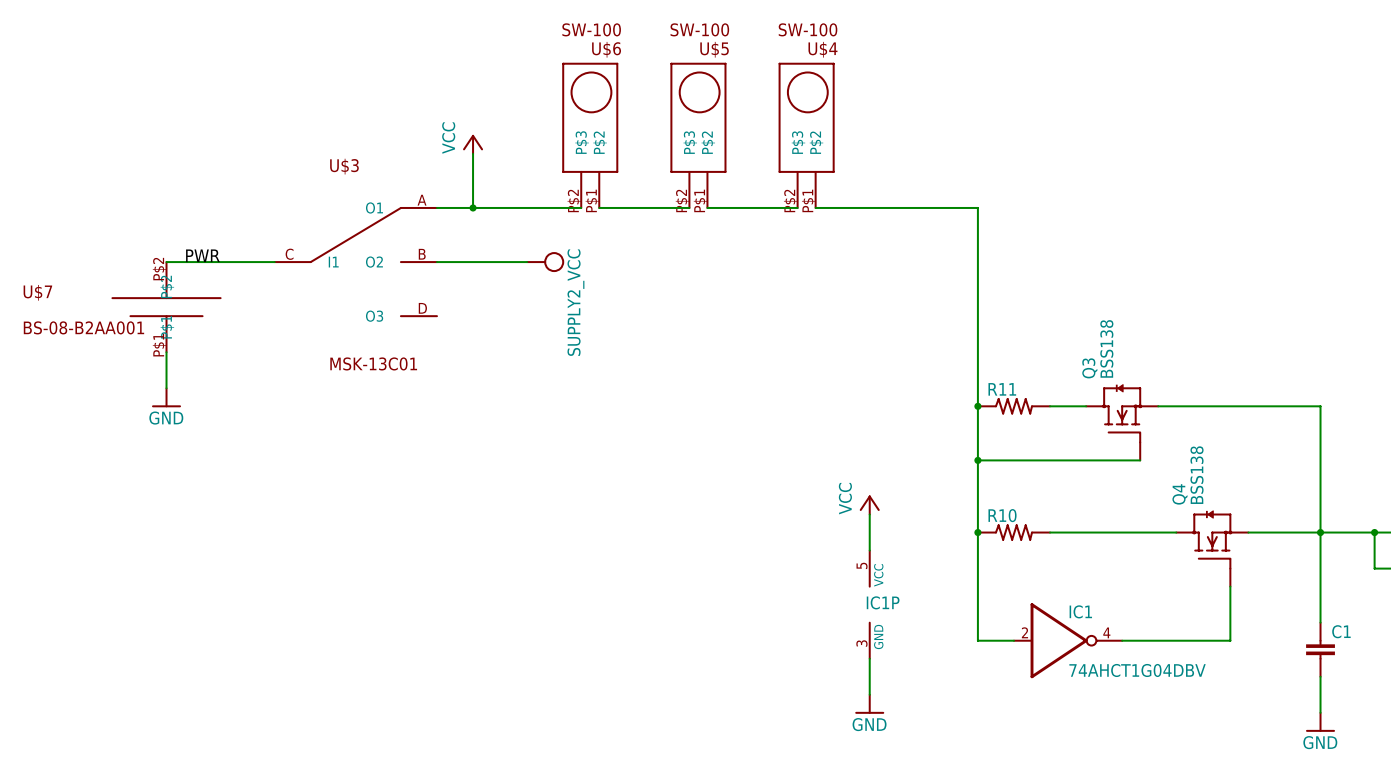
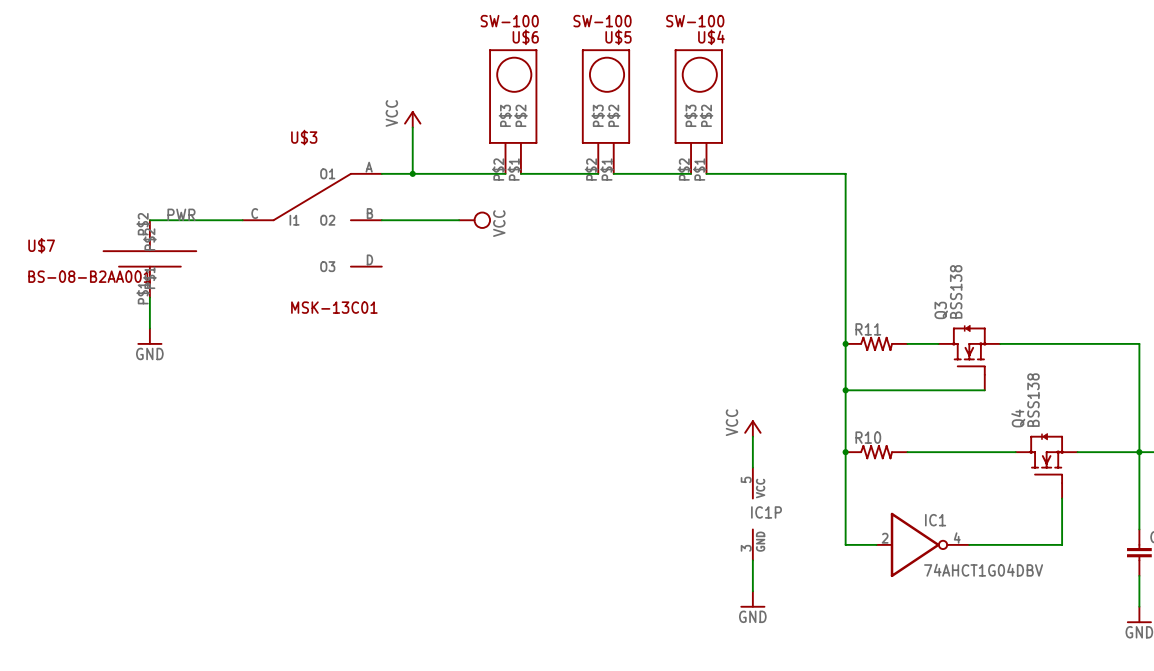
power symbol: SUPPLY2_VCC (545, 262) -> VCC (474, 220)

